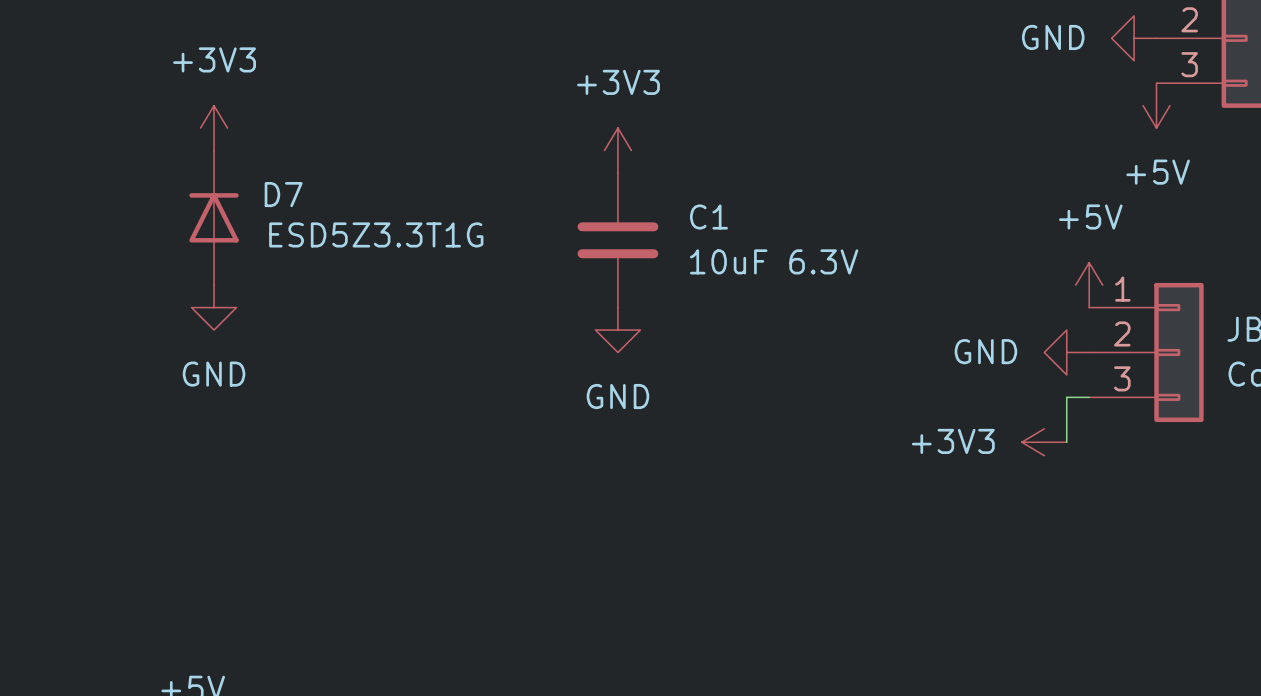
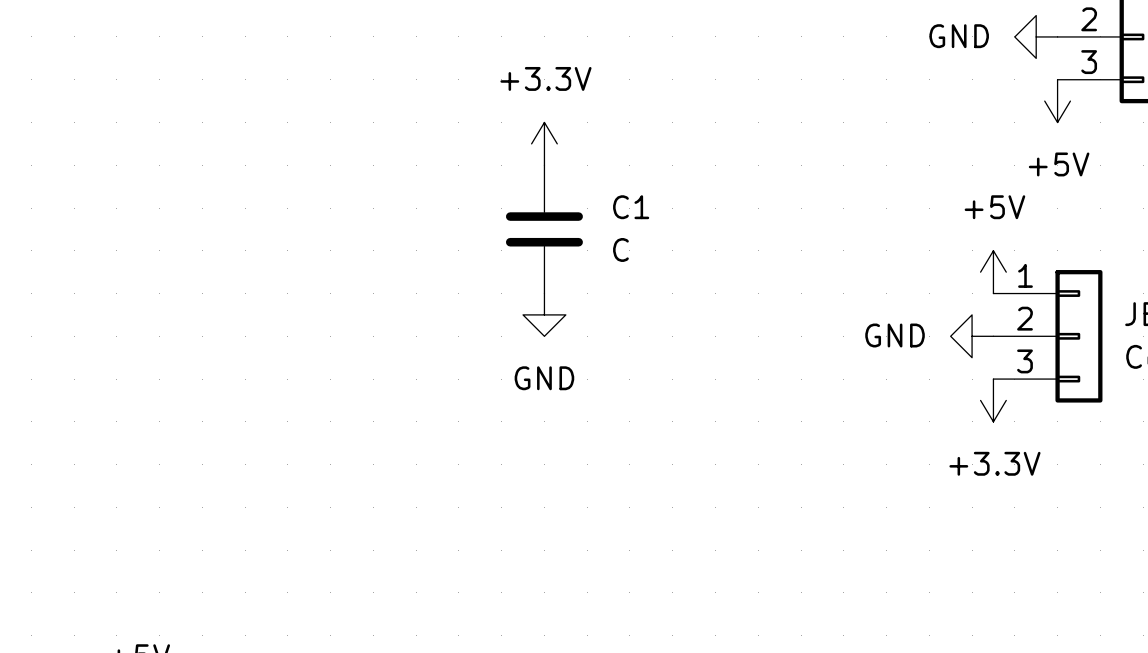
power symbol: +3V3 (214, 128) -> none
power symbol: +3V3 (617, 150) -> +3.3V (544, 143)
D7: ESD5Z3.3T1G (214, 217) -> none
C1 value: 10uF 6.3V (774, 261) -> C (620, 249)
power symbol: GND (214, 307) -> none
wire: (1089, 397) (1066, 397) (1066, 442) -> none
power symbol: none -> +3.3V (993, 400)
power symbol: +3V3 (1044, 442) -> none

